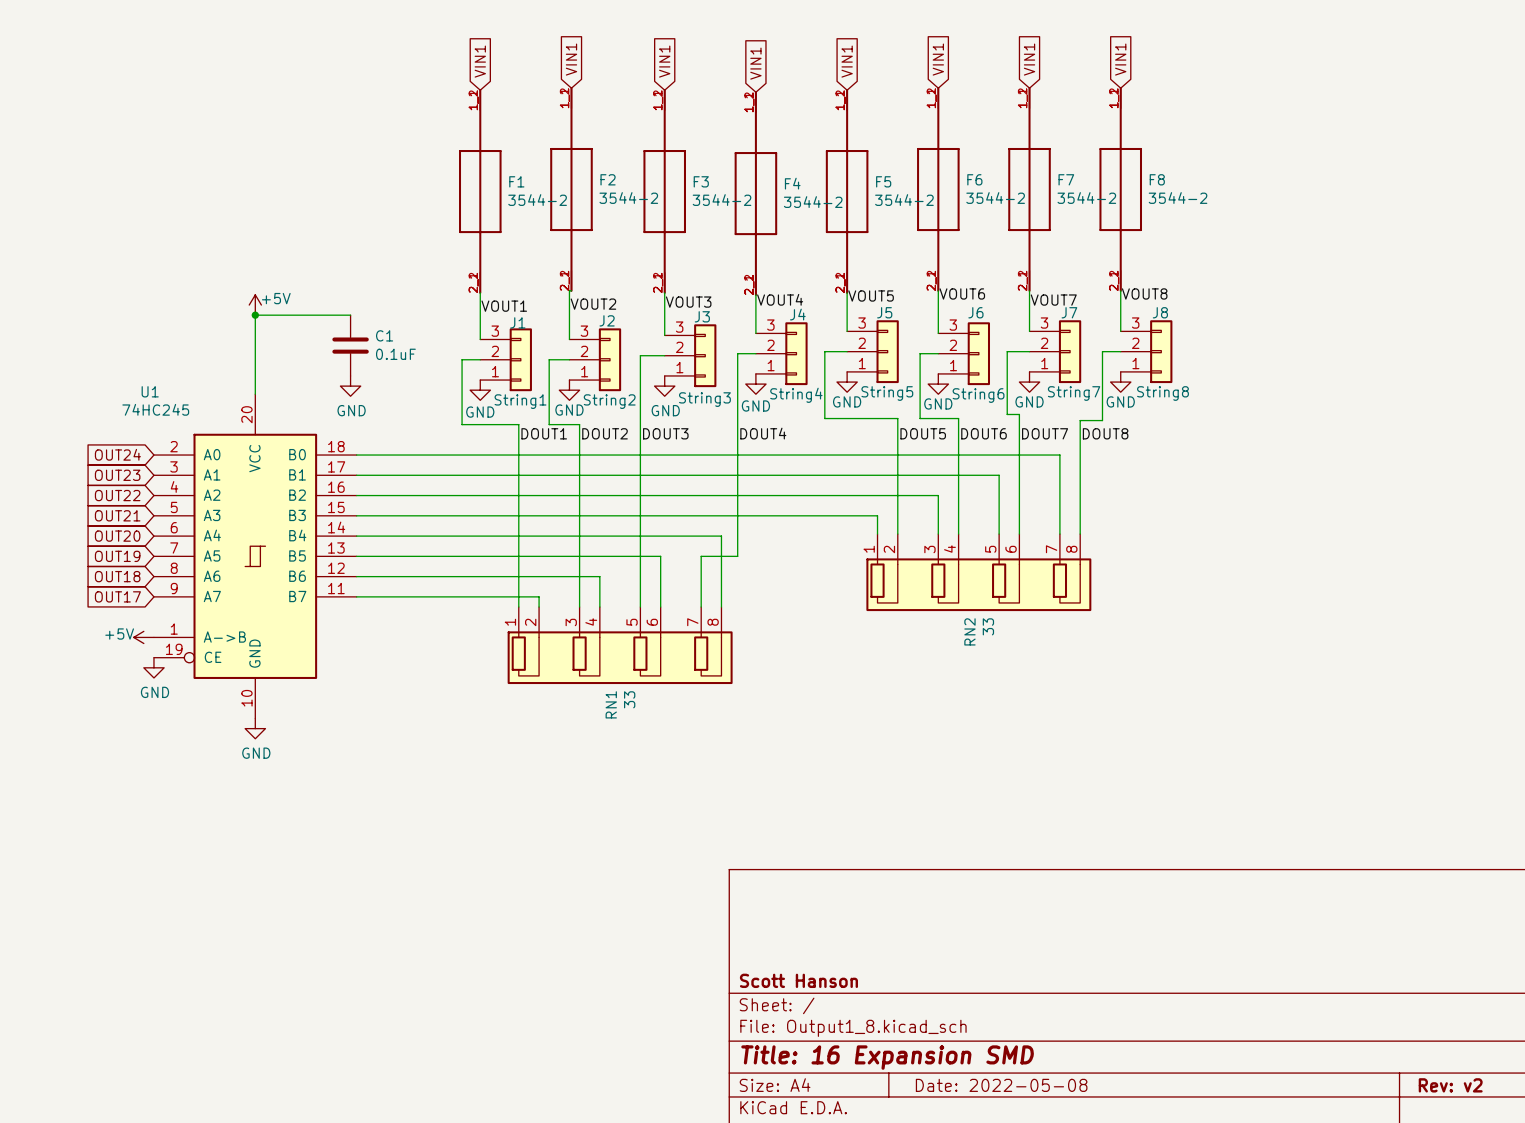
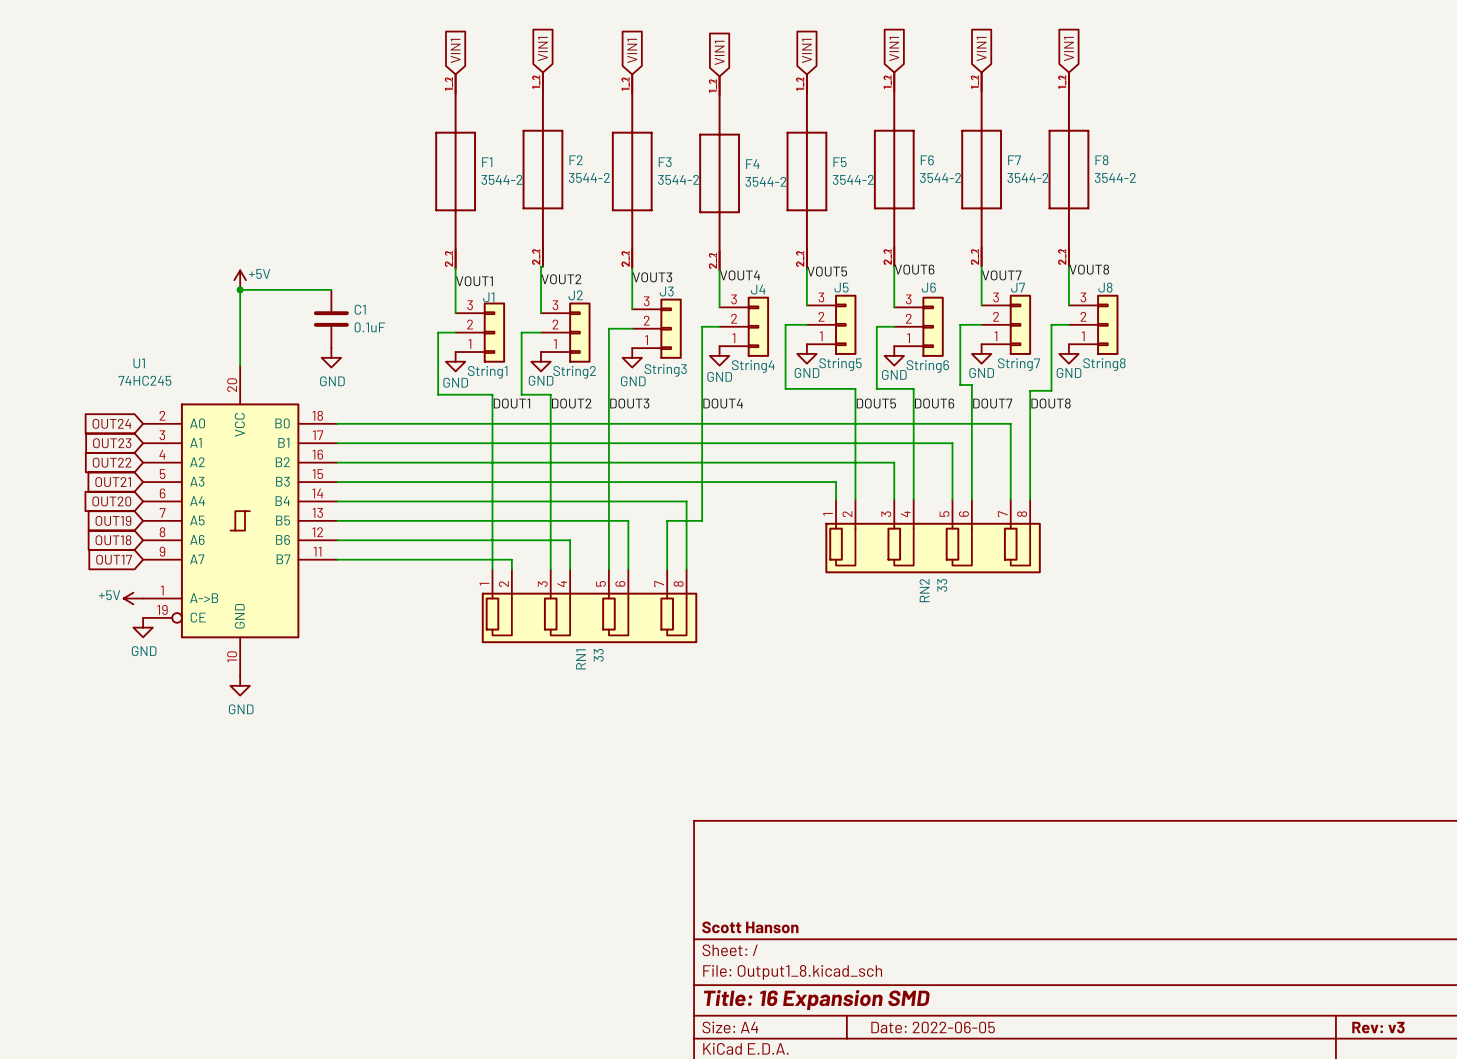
title block: Date: 2022-05-08 (1001, 1085) -> Date: 2022-06-05 (933, 1027)
title block: Rev: v2 (1450, 1085) -> Rev: v3 (1378, 1027)

